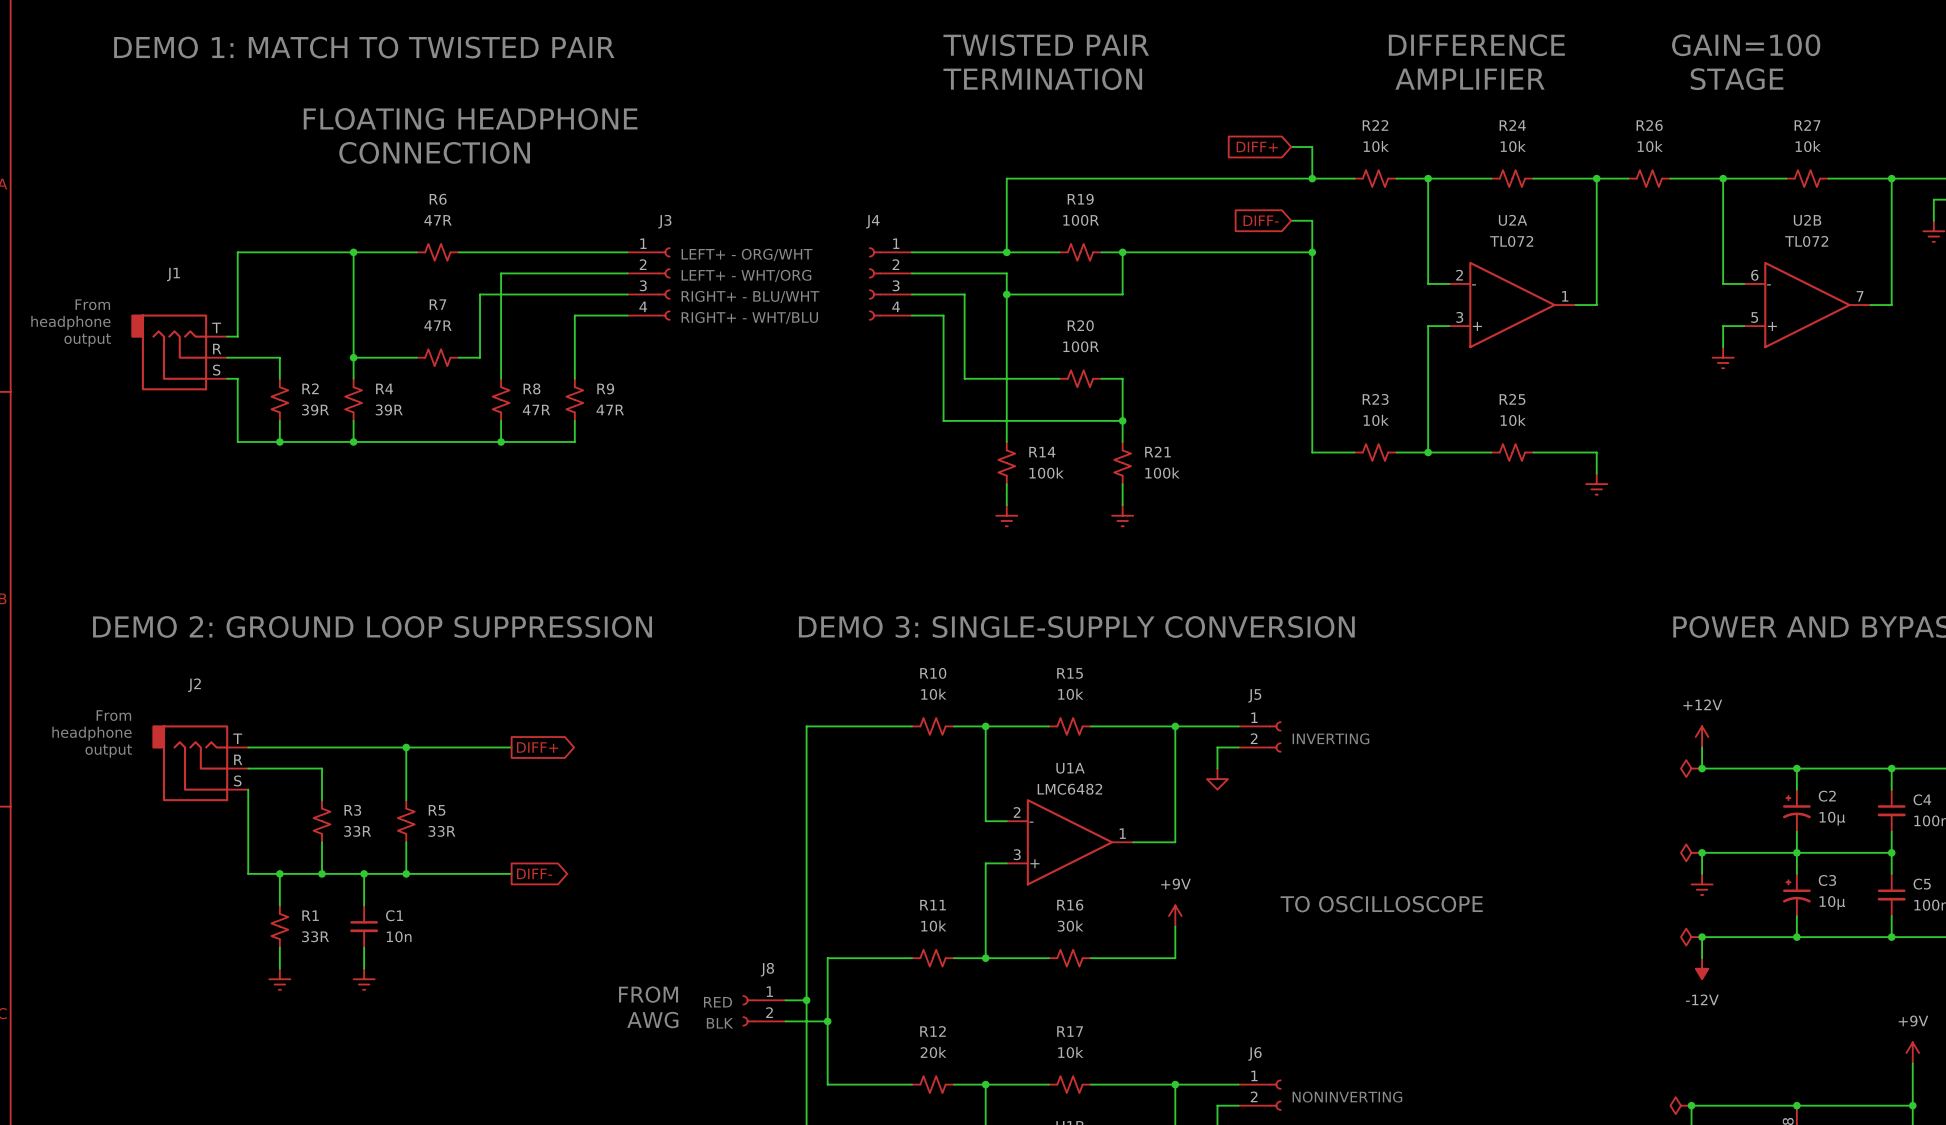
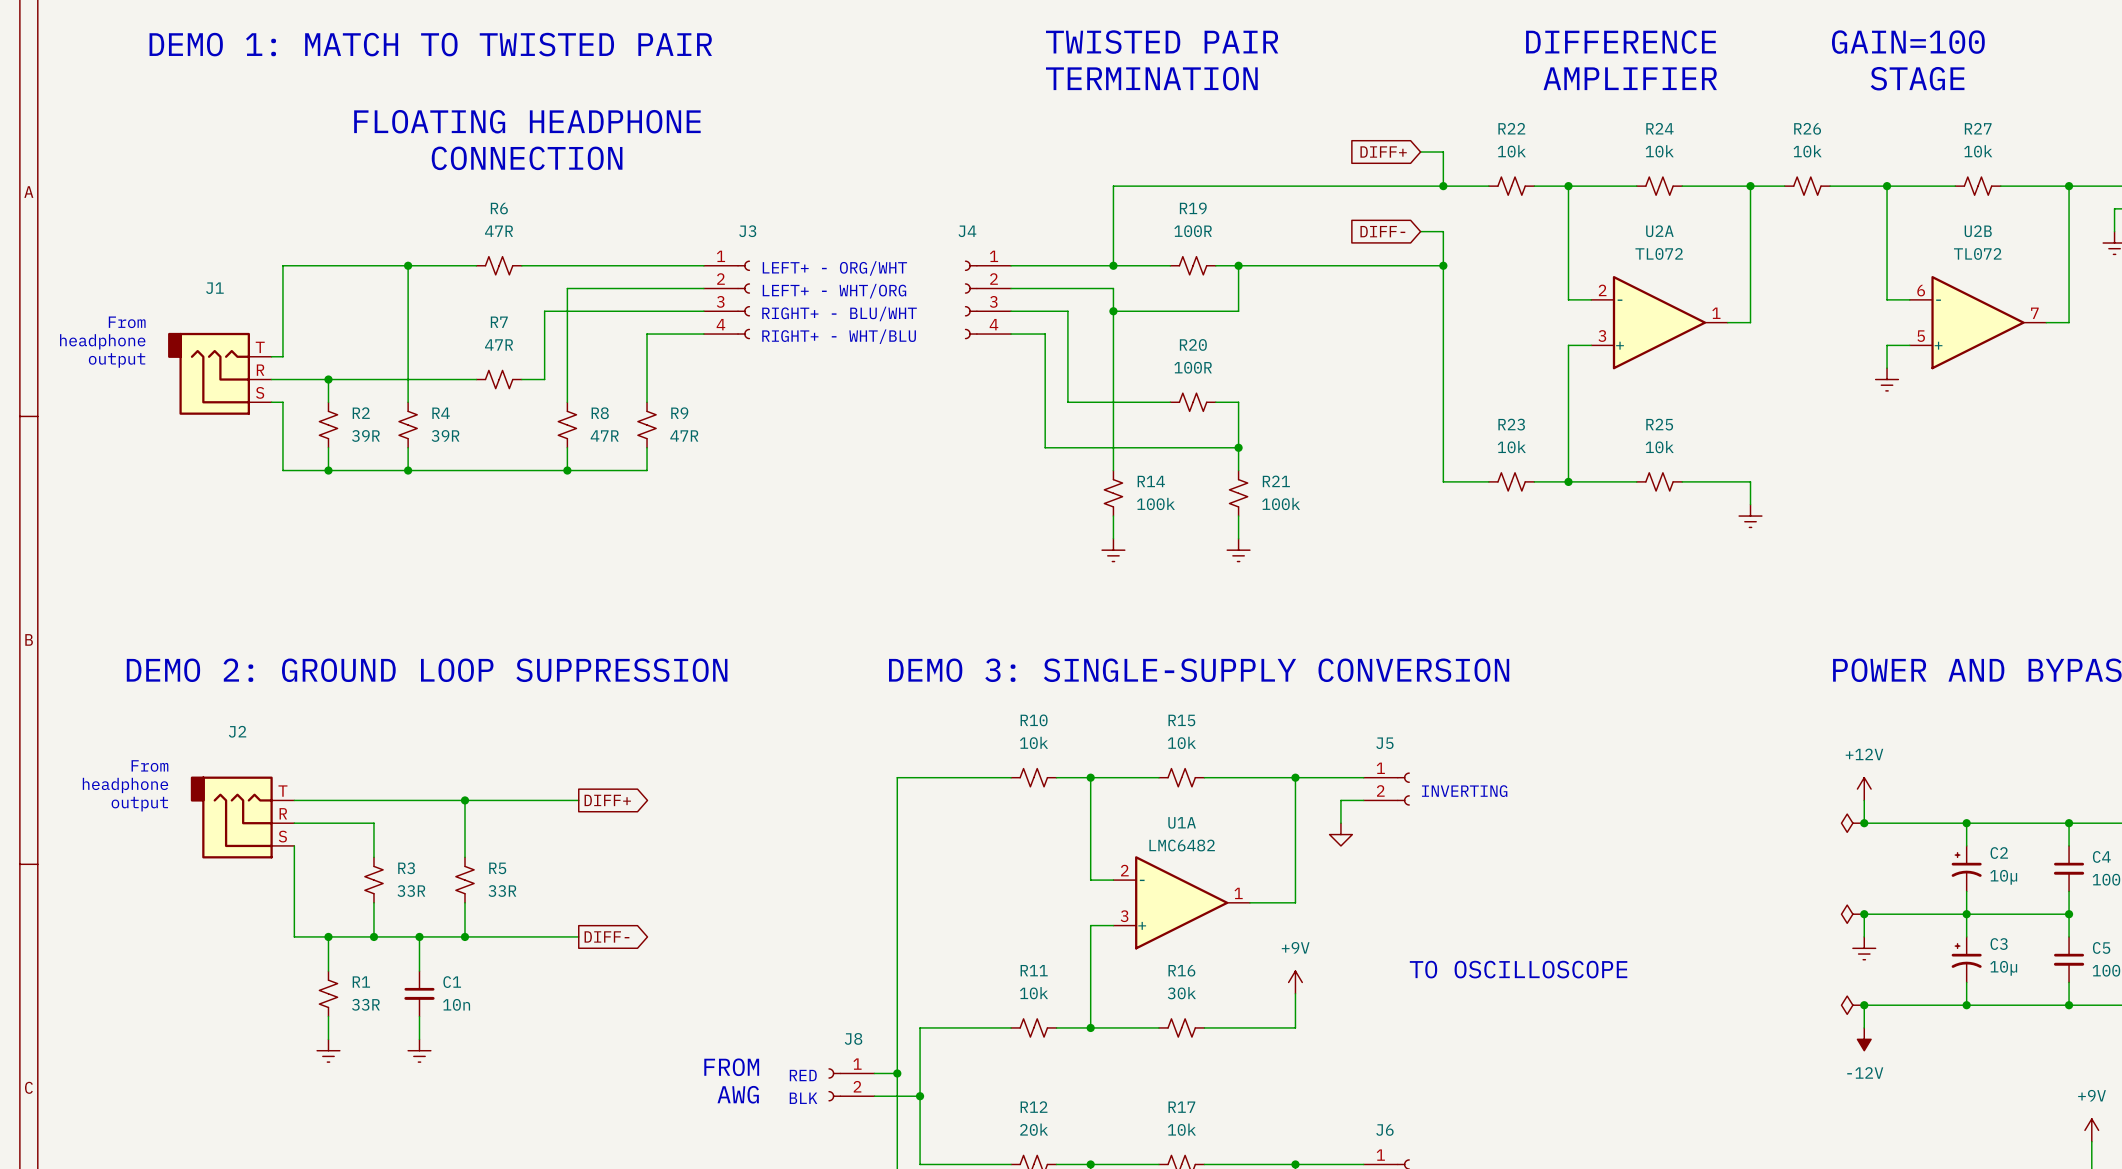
wire: none -> (328, 379) (408, 379)
junction: none -> (328, 379)
junction: (353, 357) -> none

